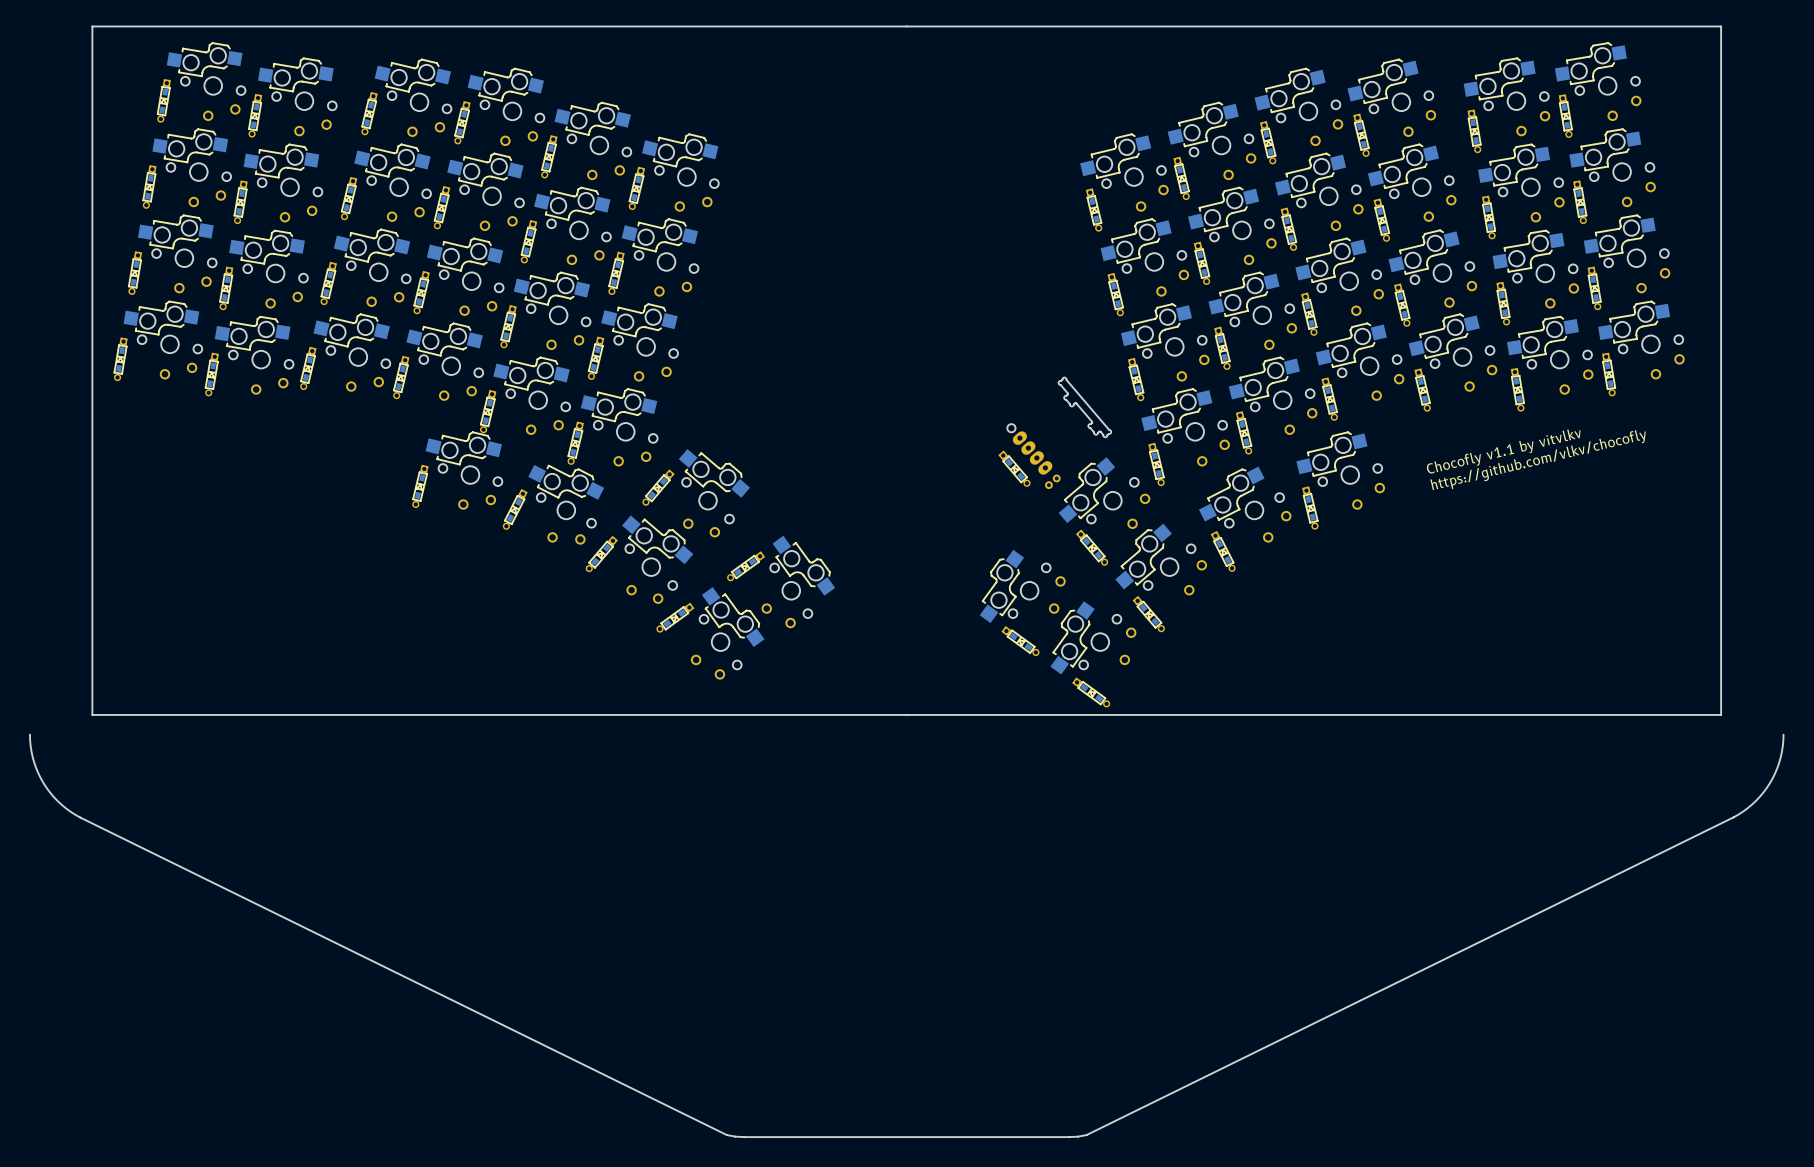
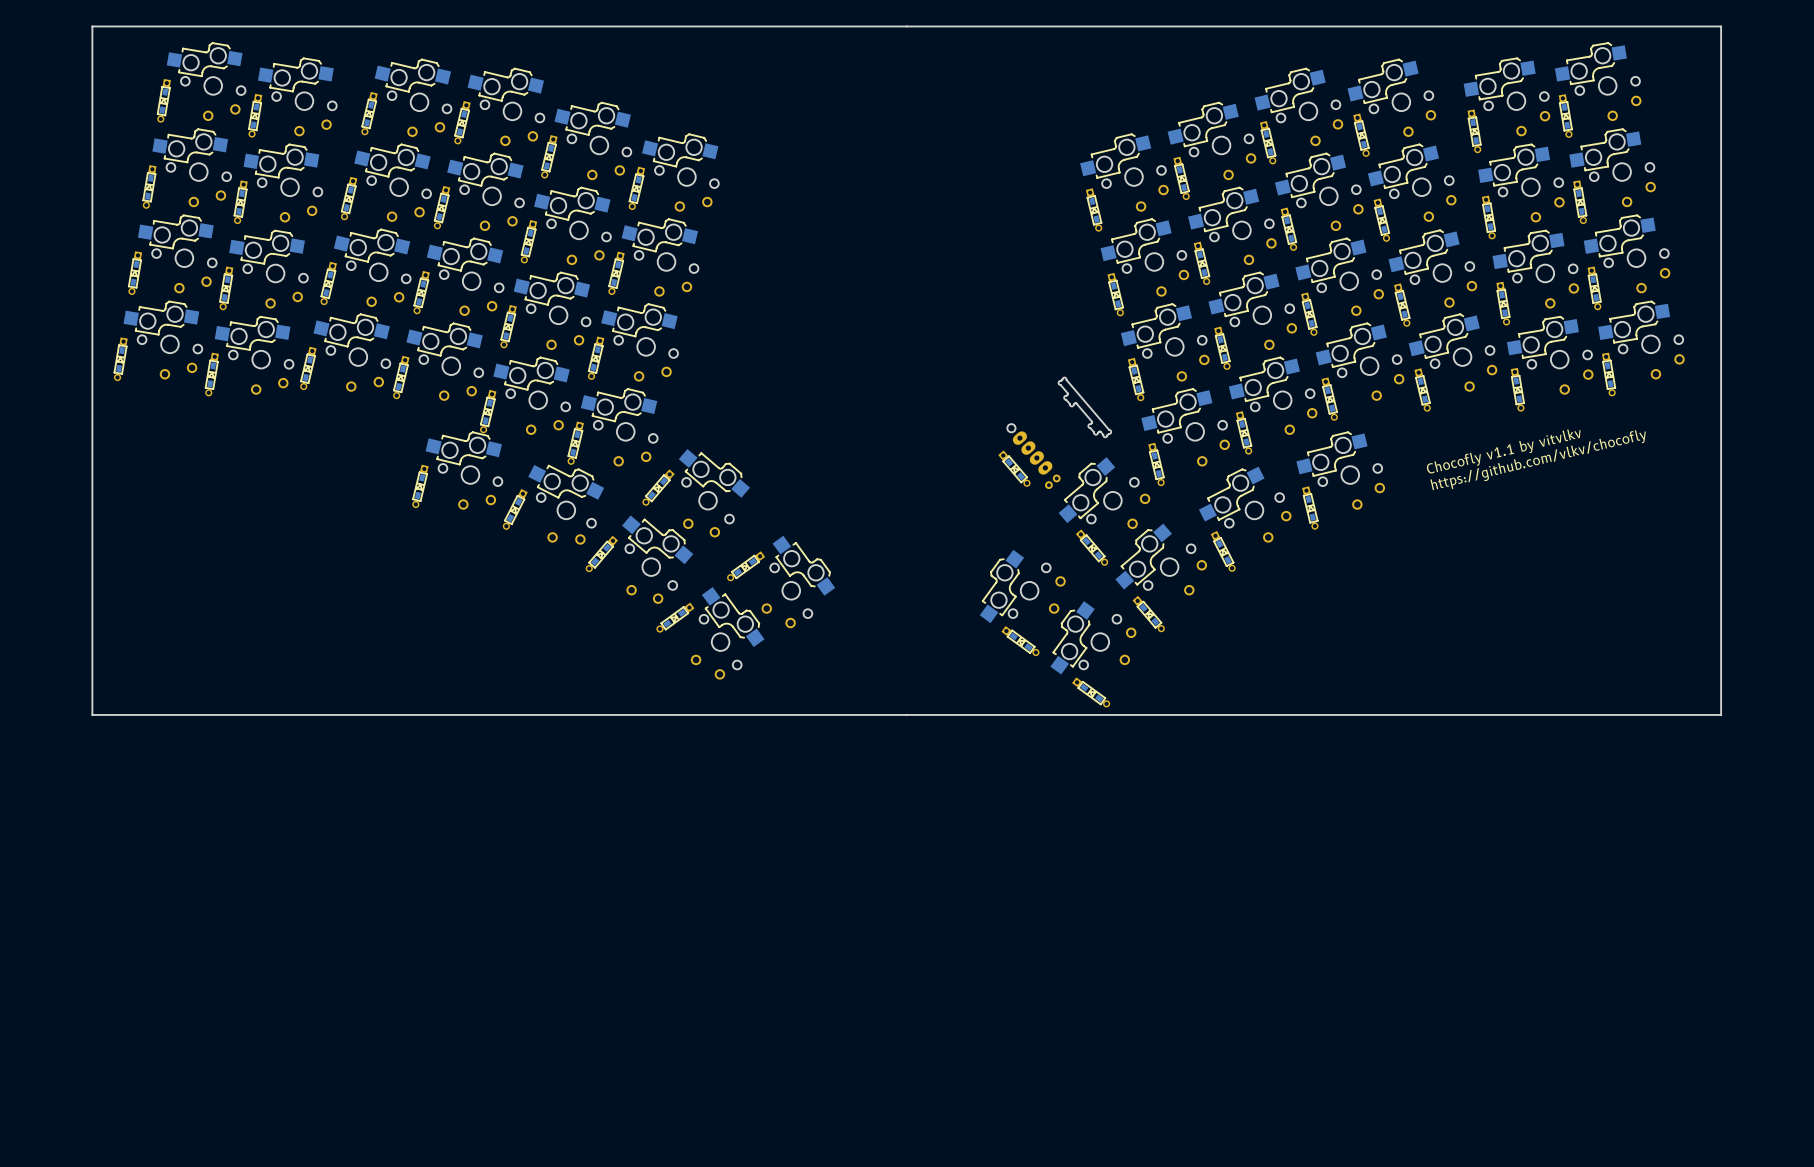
board edge: (1783, 734) (1780, 757) (1770, 783) (1756, 800) (1738, 814) (1086, 1135) (1069, 1137) (744, 1137) (726, 1135) (75, 814) (57, 800) (43, 783) (32, 757) (29, 734) -> none

